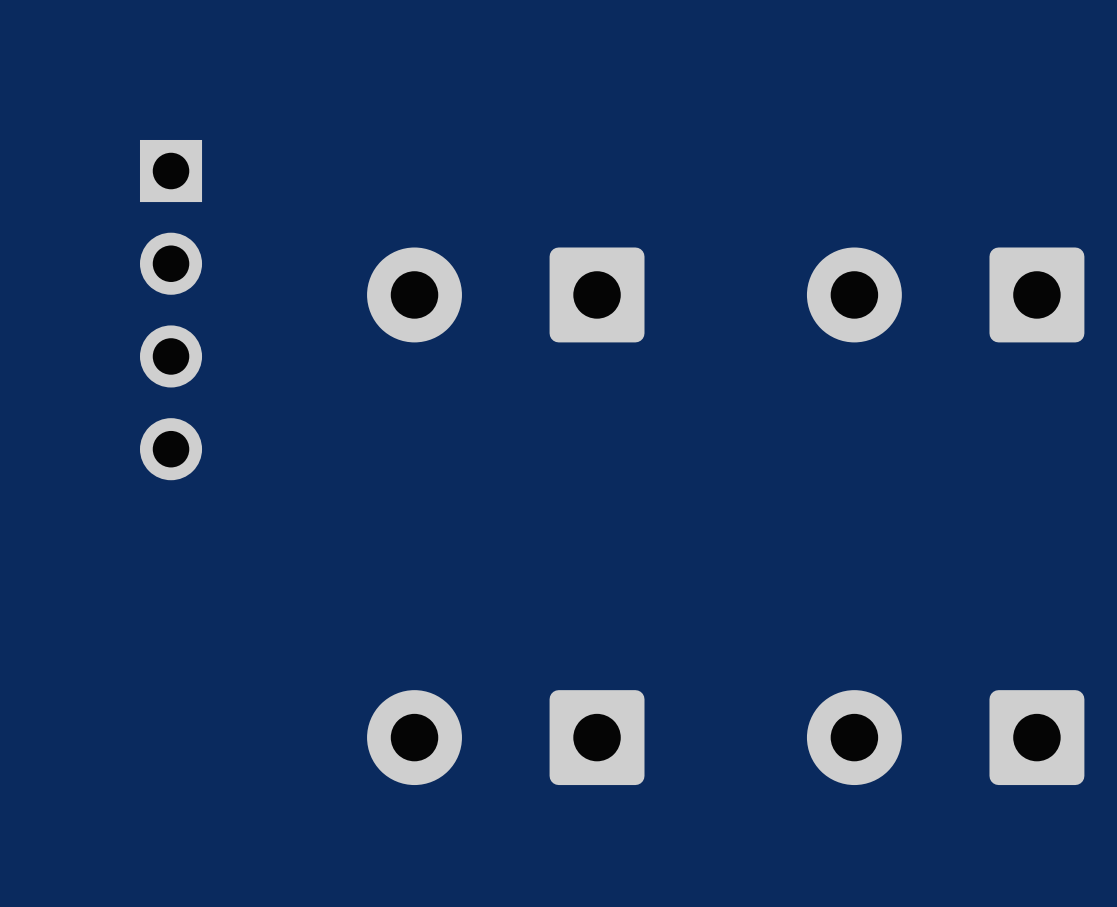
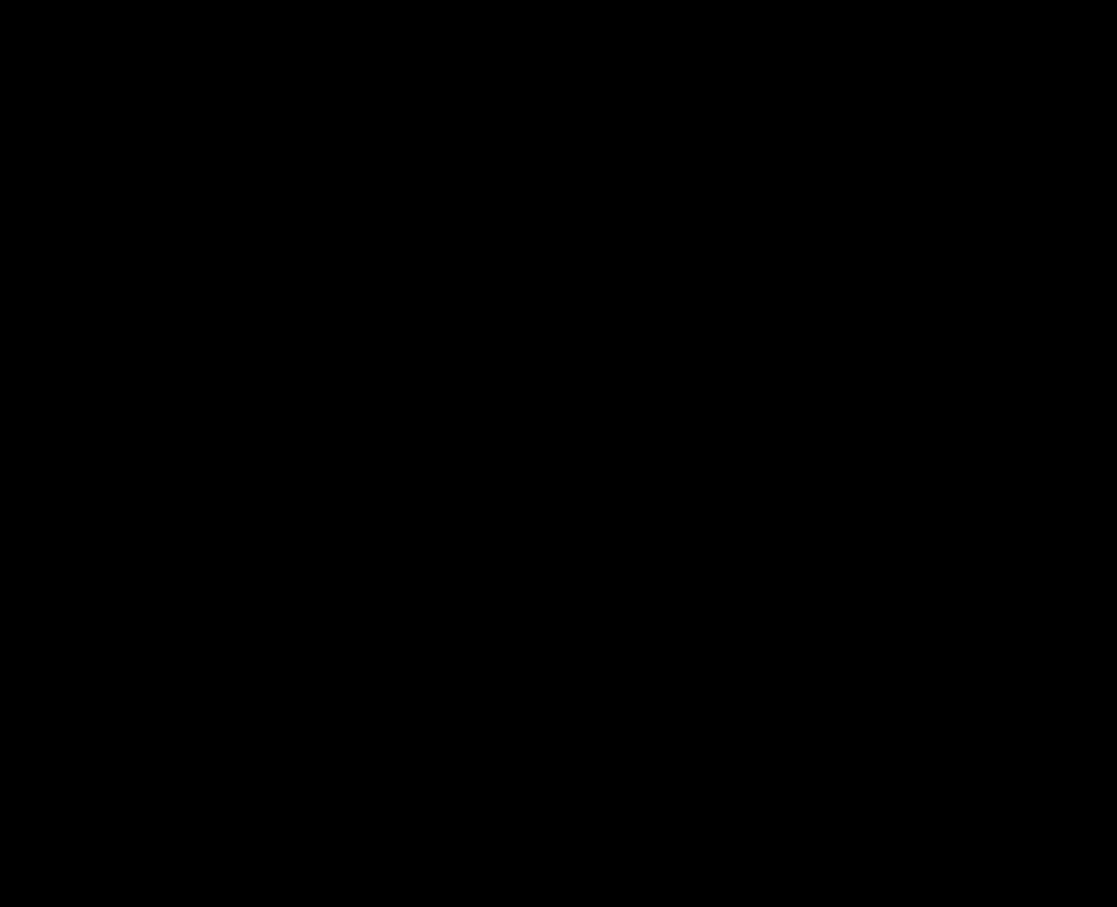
part: (505, 294) -> none
part: (945, 294) -> none
part: (171, 310) -> none
part: (505, 737) -> none
part: (945, 737) -> none

